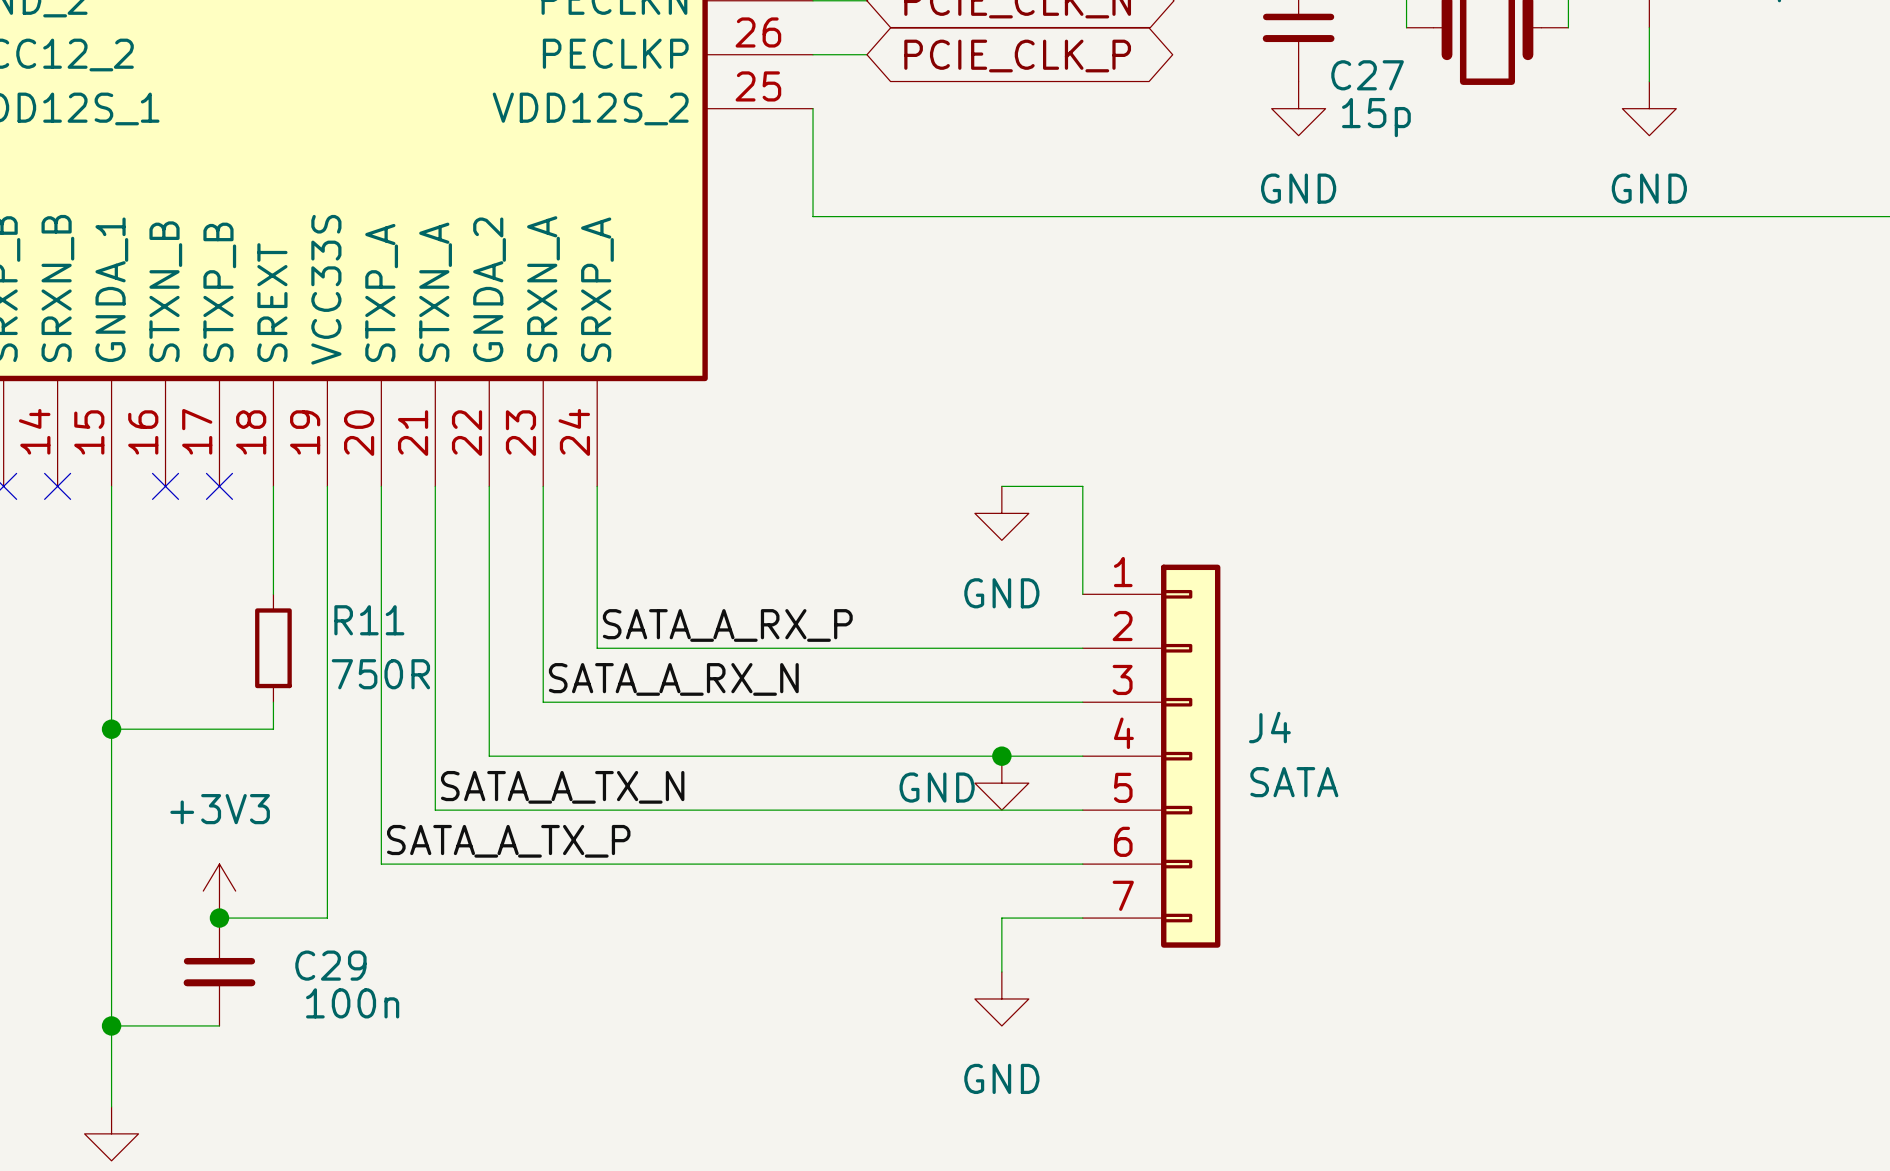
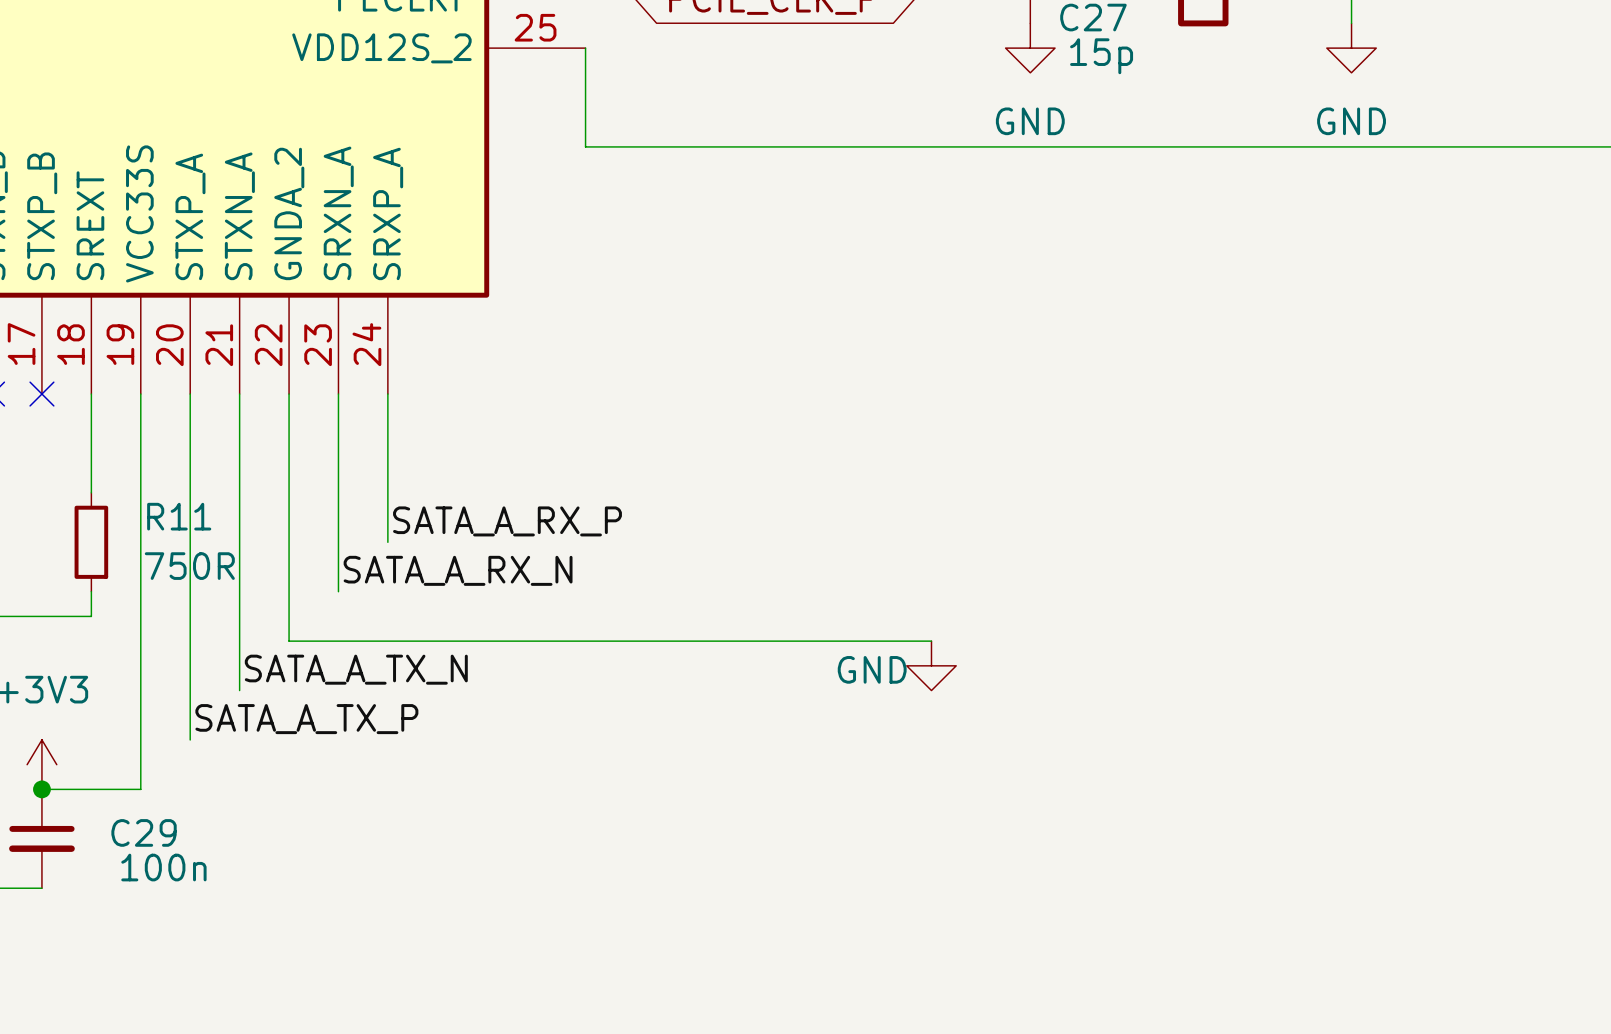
wire: (1001, 486) (1082, 486) (1082, 594) -> none
power symbol: GND (1001, 513) -> none
wire: (597, 648) (1082, 648) -> none
wire: (543, 702) (1082, 702) -> none
junction: (1001, 756) -> none
J4: SATA (1151, 756) -> none
power symbol: GND (1001, 783) -> none
power symbol: none -> GND (931, 665)
wire: (435, 810) (1082, 810) -> none
wire: (381, 864) (1082, 864) -> none
wire: (1082, 918) (1001, 918) (1001, 972) -> none
power symbol: GND (1001, 998) -> none

